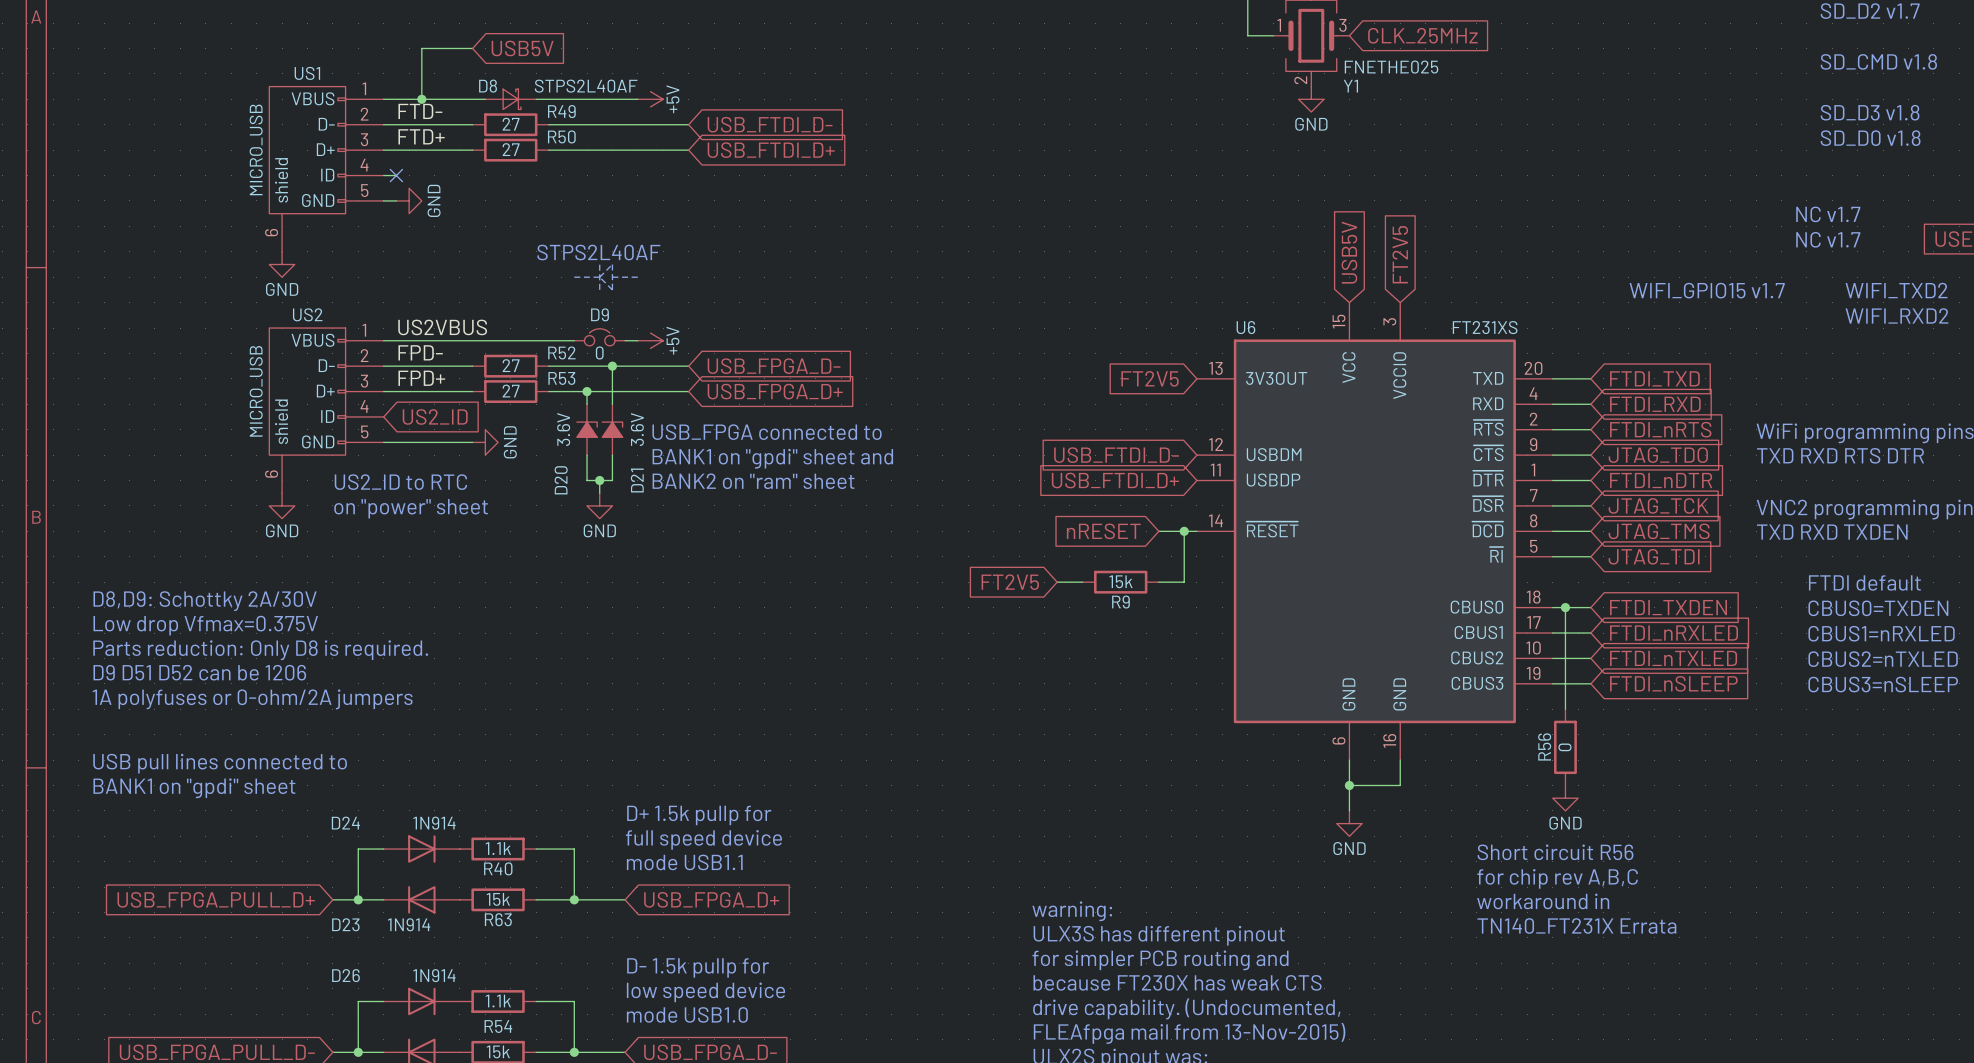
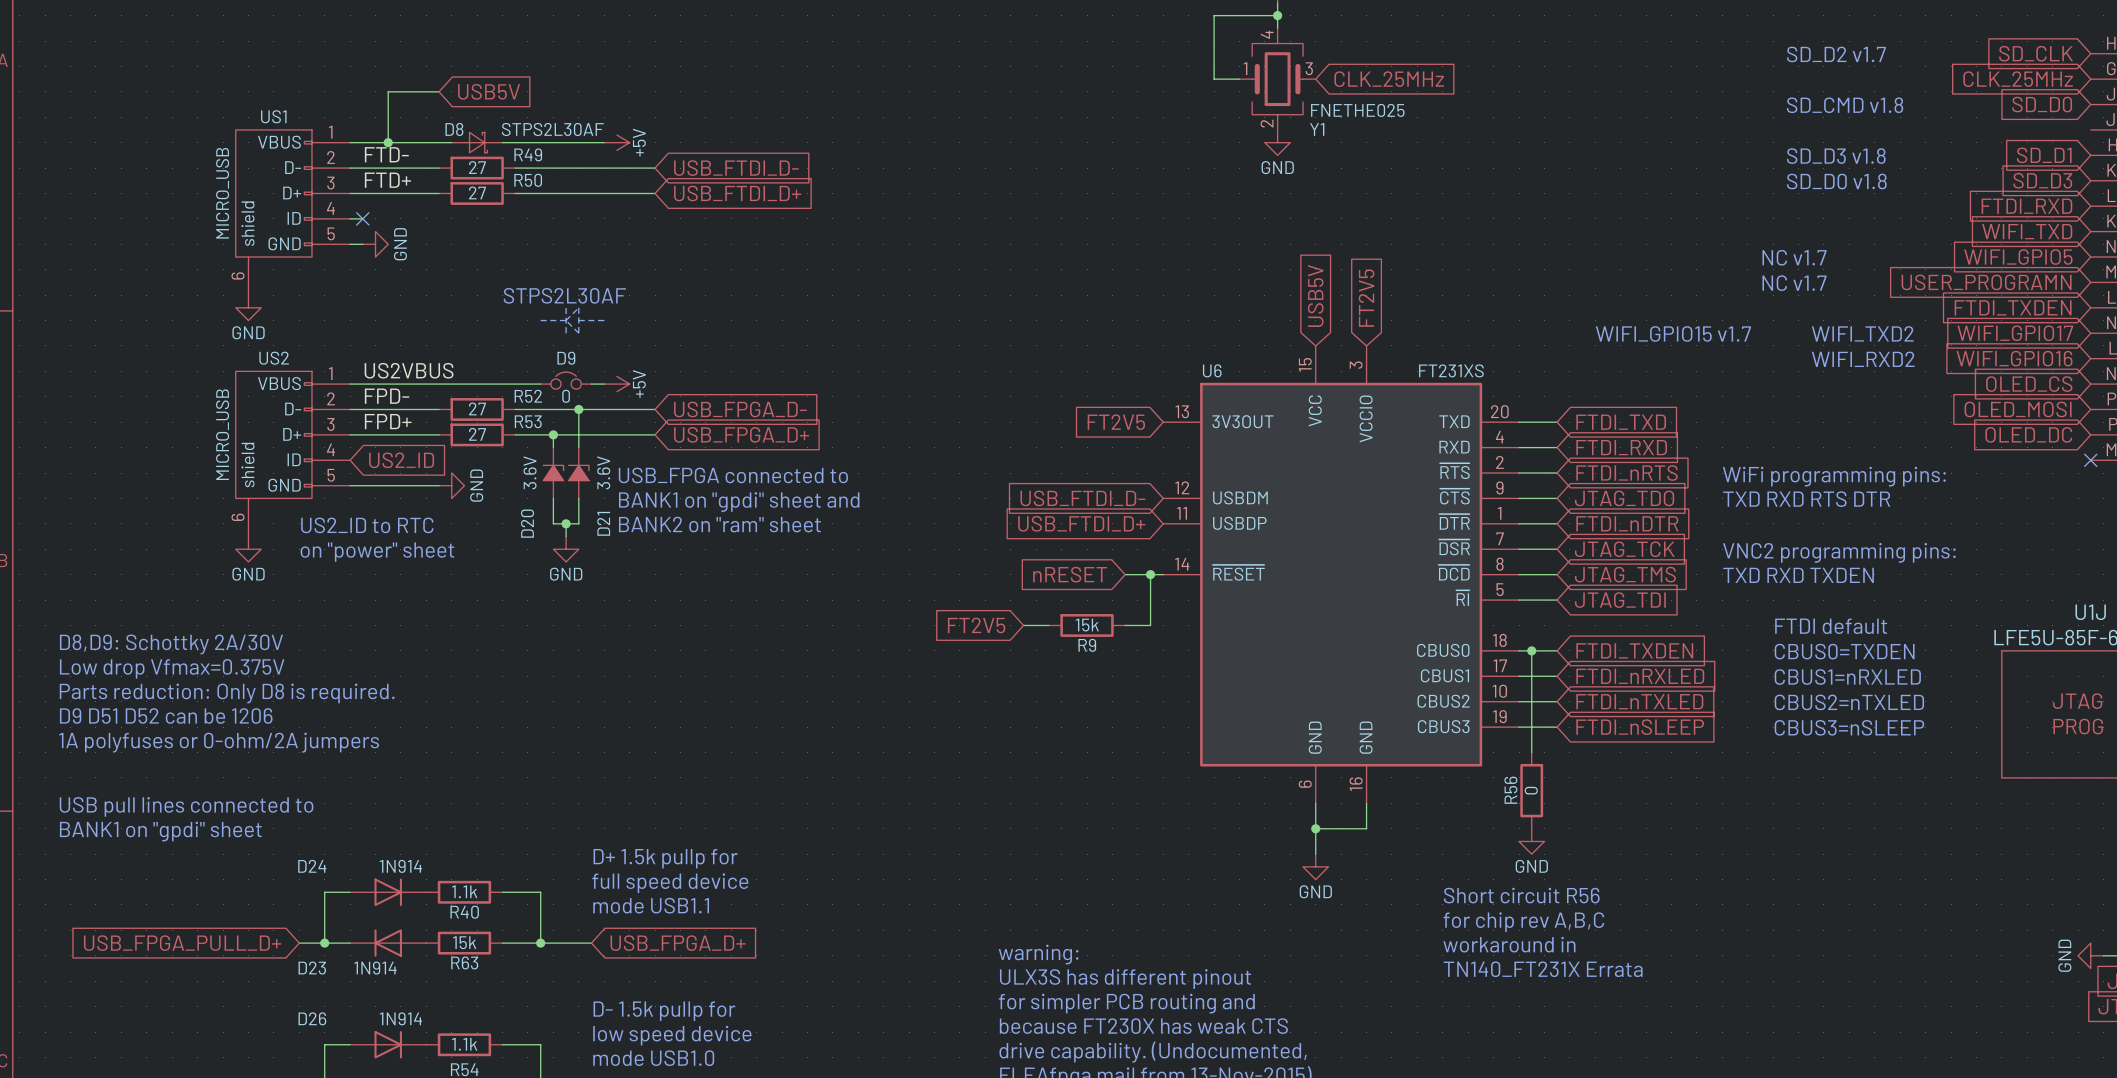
D8 value: STPS2L40AF (586, 86) -> STPS2L30AF (552, 129)
text: STPS2L40AF (598, 252) -> STPS2L30AF (564, 295)

